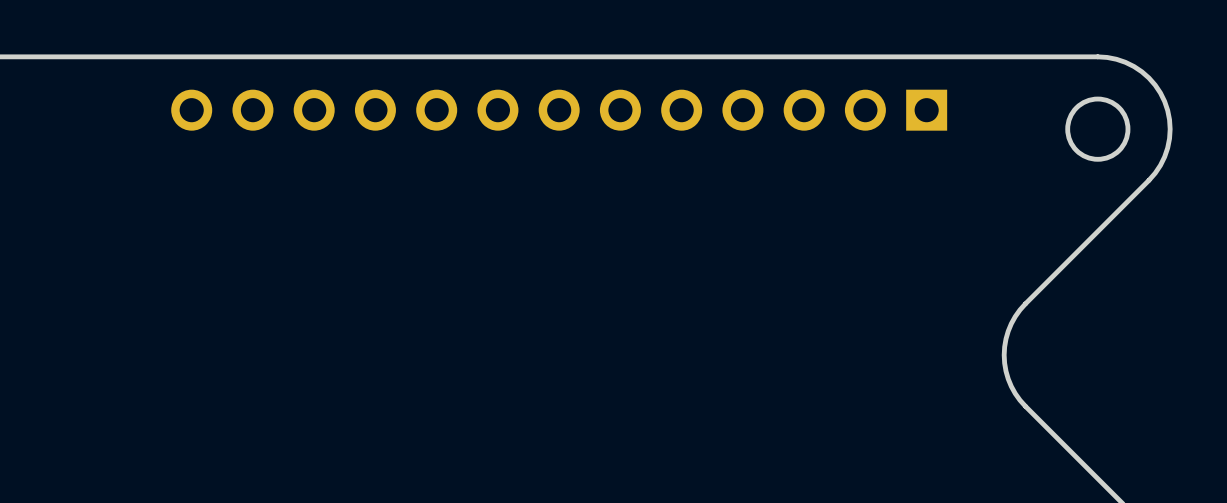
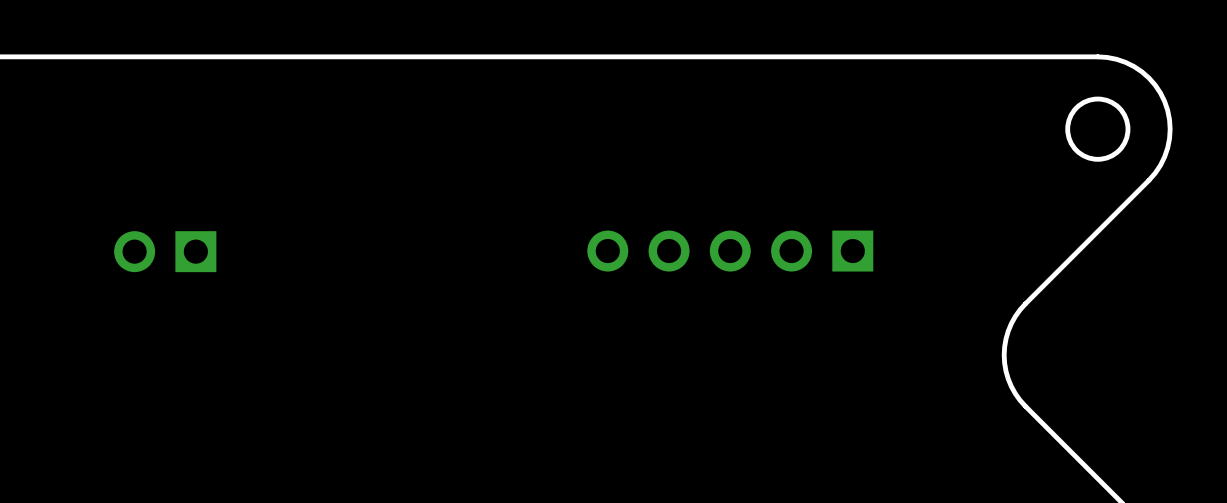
part: (559, 110) -> none
part: none -> (165, 251)
part: none -> (730, 251)

